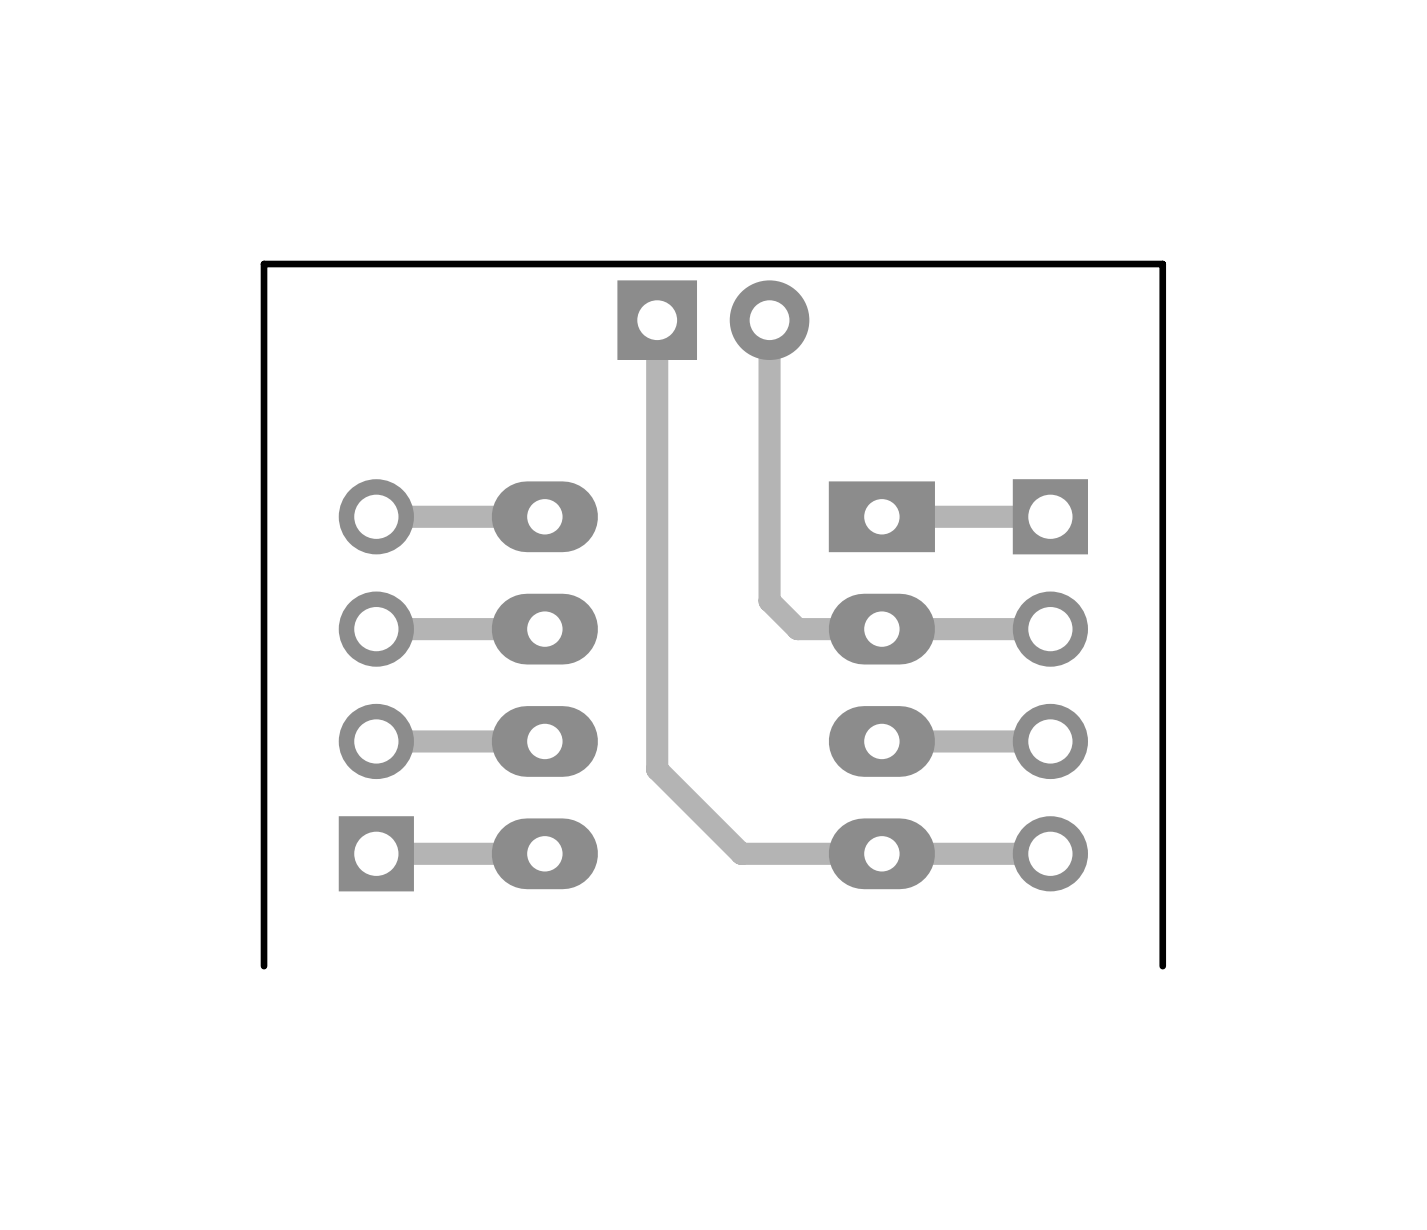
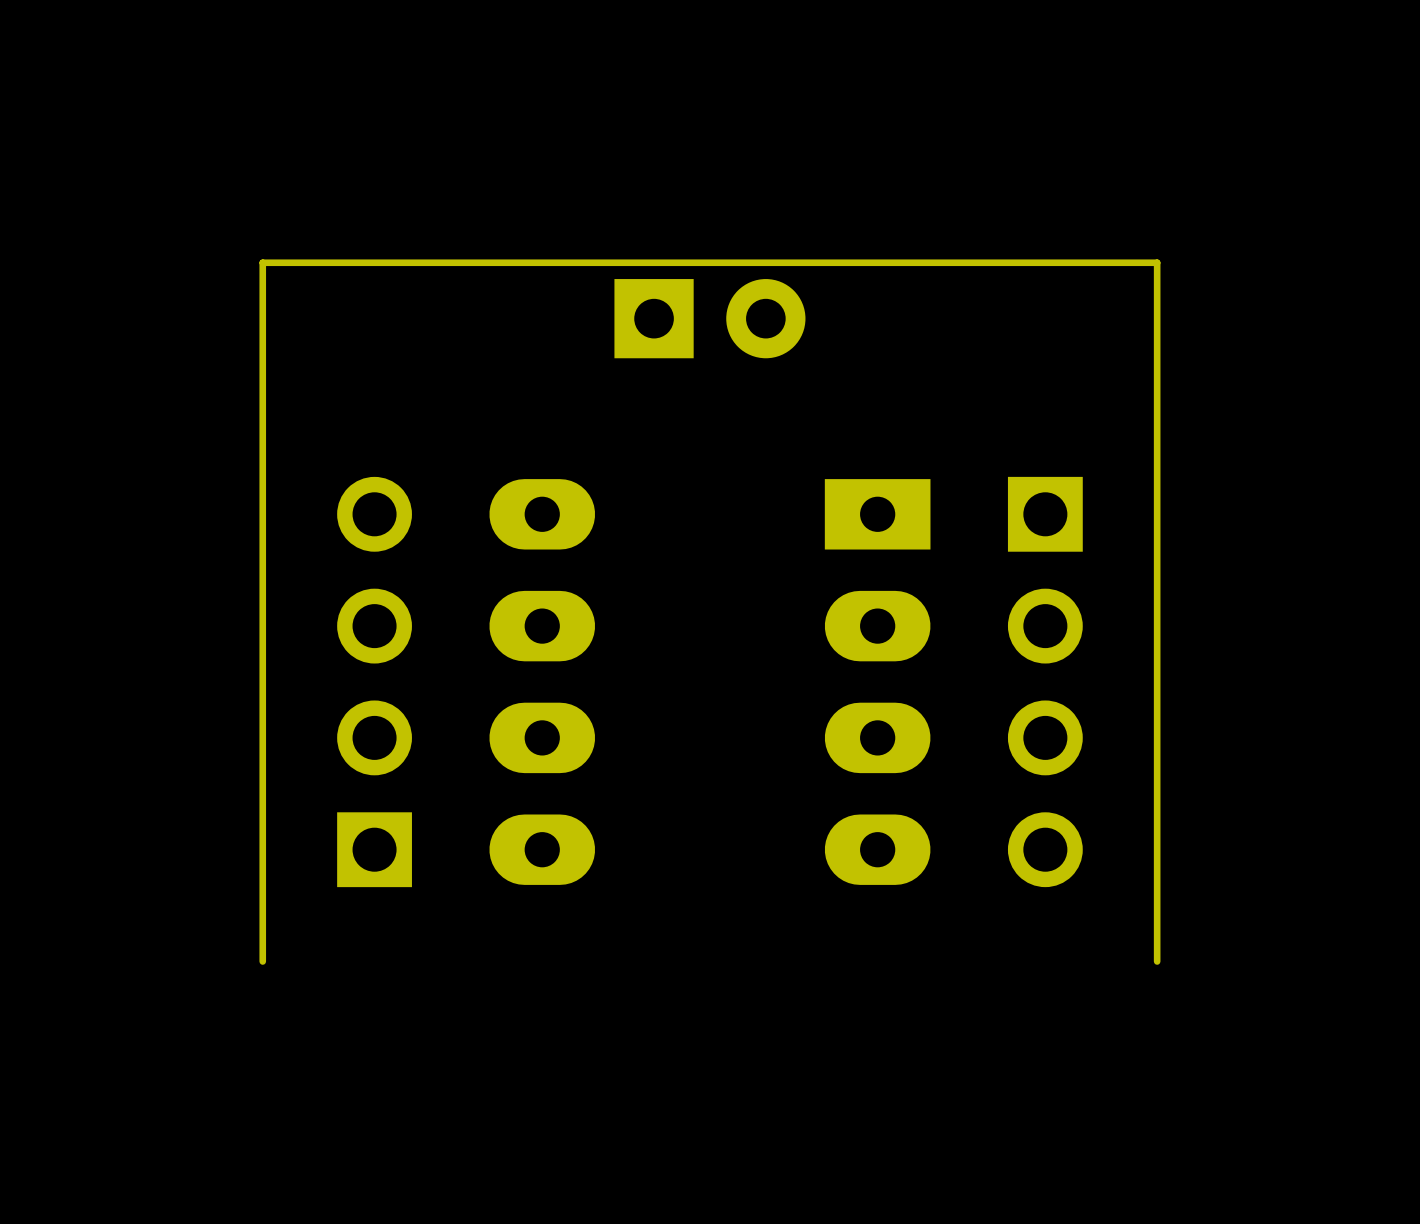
track: (657, 320) (657, 769) (741, 853) (1050, 853) -> none
track: (769, 320) (769, 601) (797, 629) (1050, 629) -> none
track: (544, 516) (376, 516) -> none
track: (1050, 516) (881, 516) -> none
track: (544, 629) (376, 629) -> none
track: (544, 741) (376, 741) -> none
track: (1050, 741) (881, 741) -> none
track: (544, 853) (376, 853) -> none

